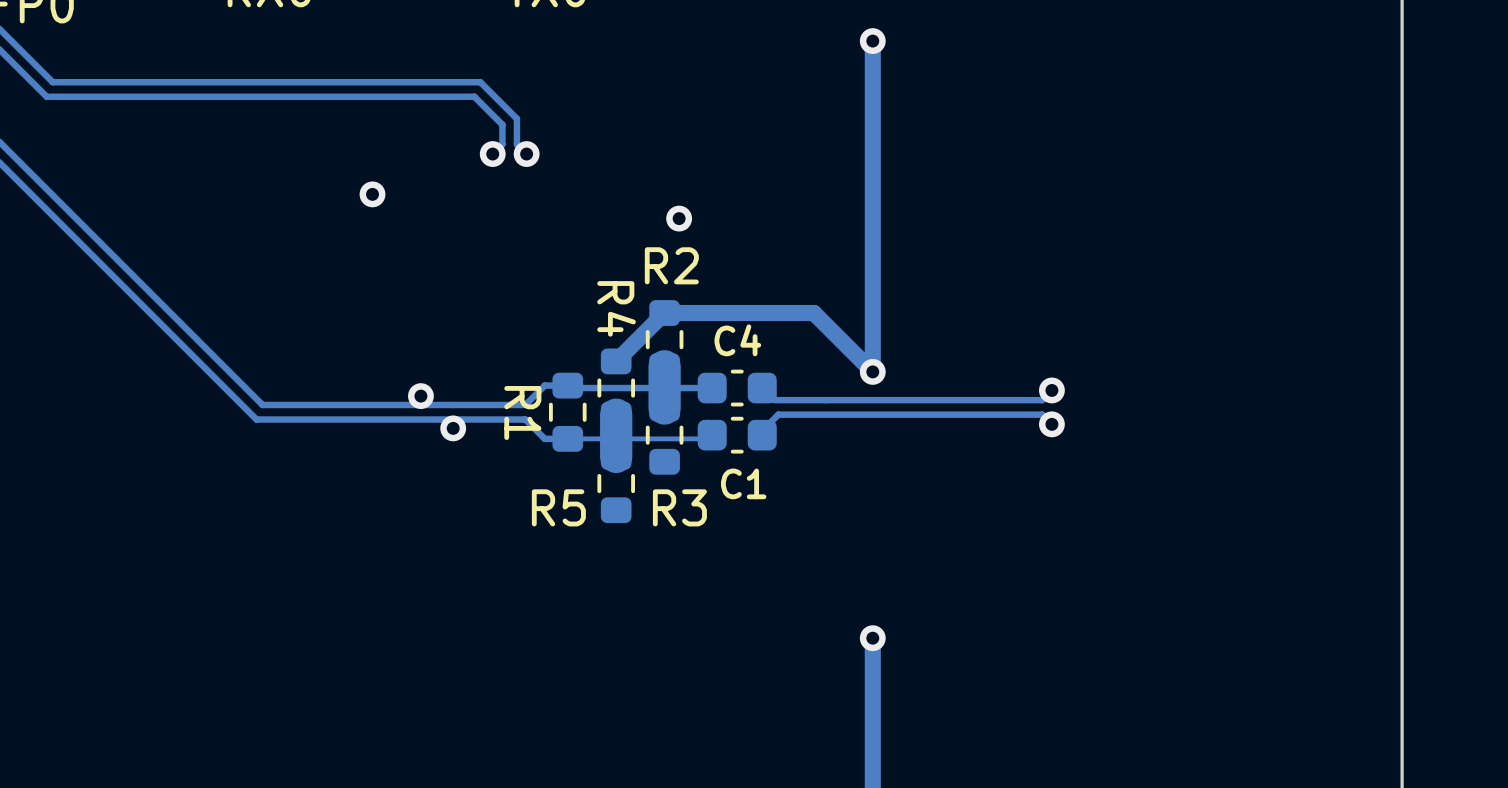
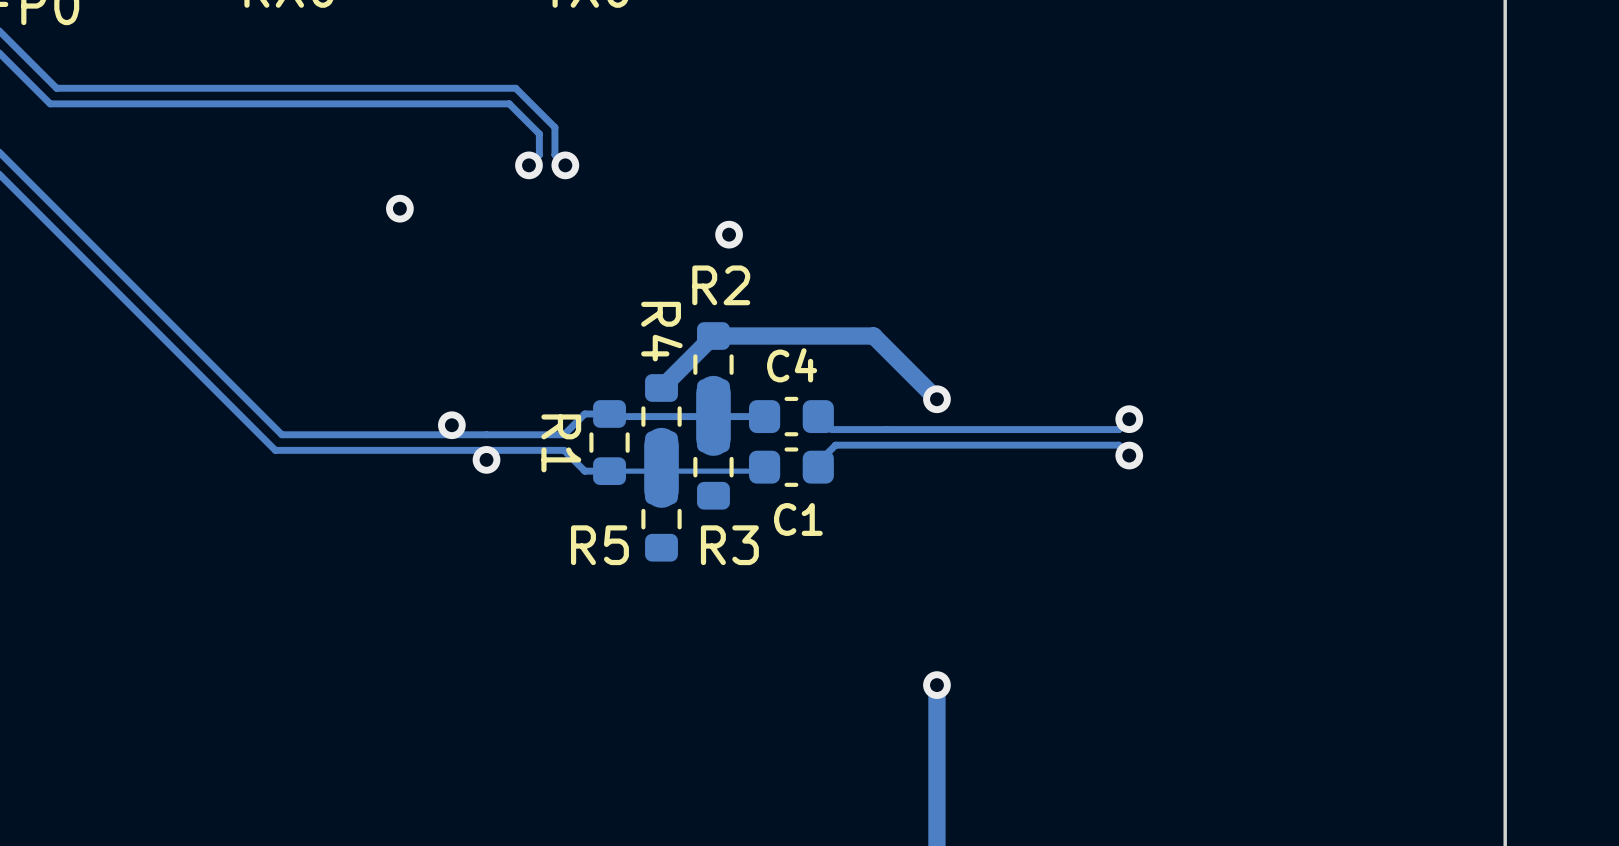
track: (872, 41) (872, 371) -> none
via: (872, 41) -> none

